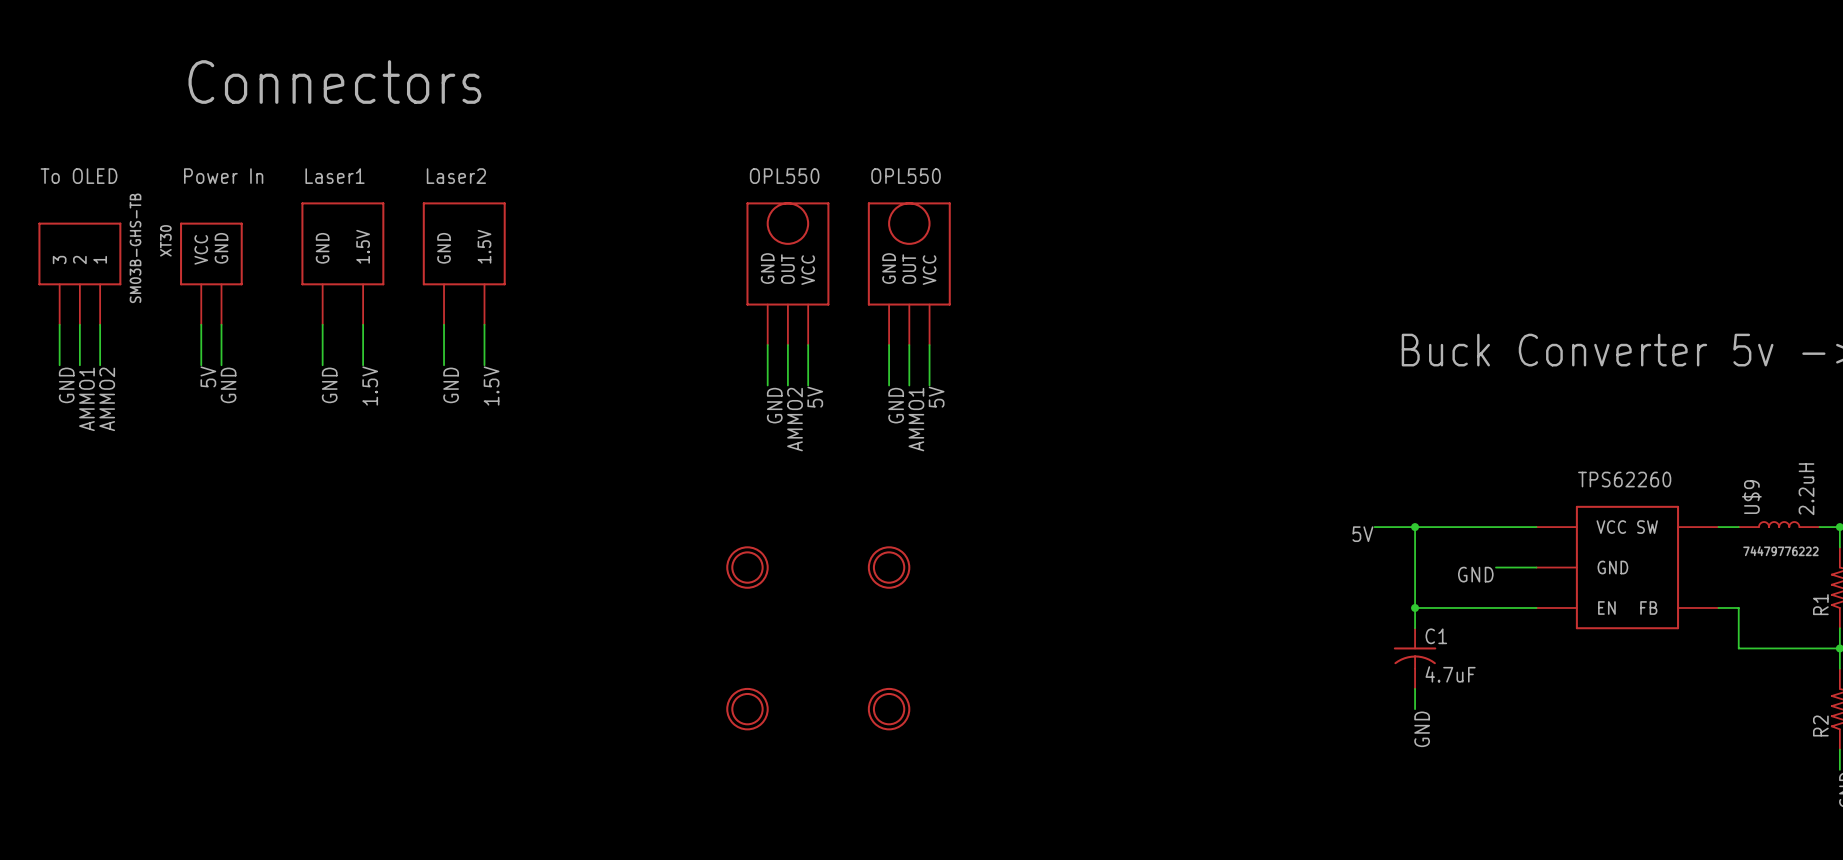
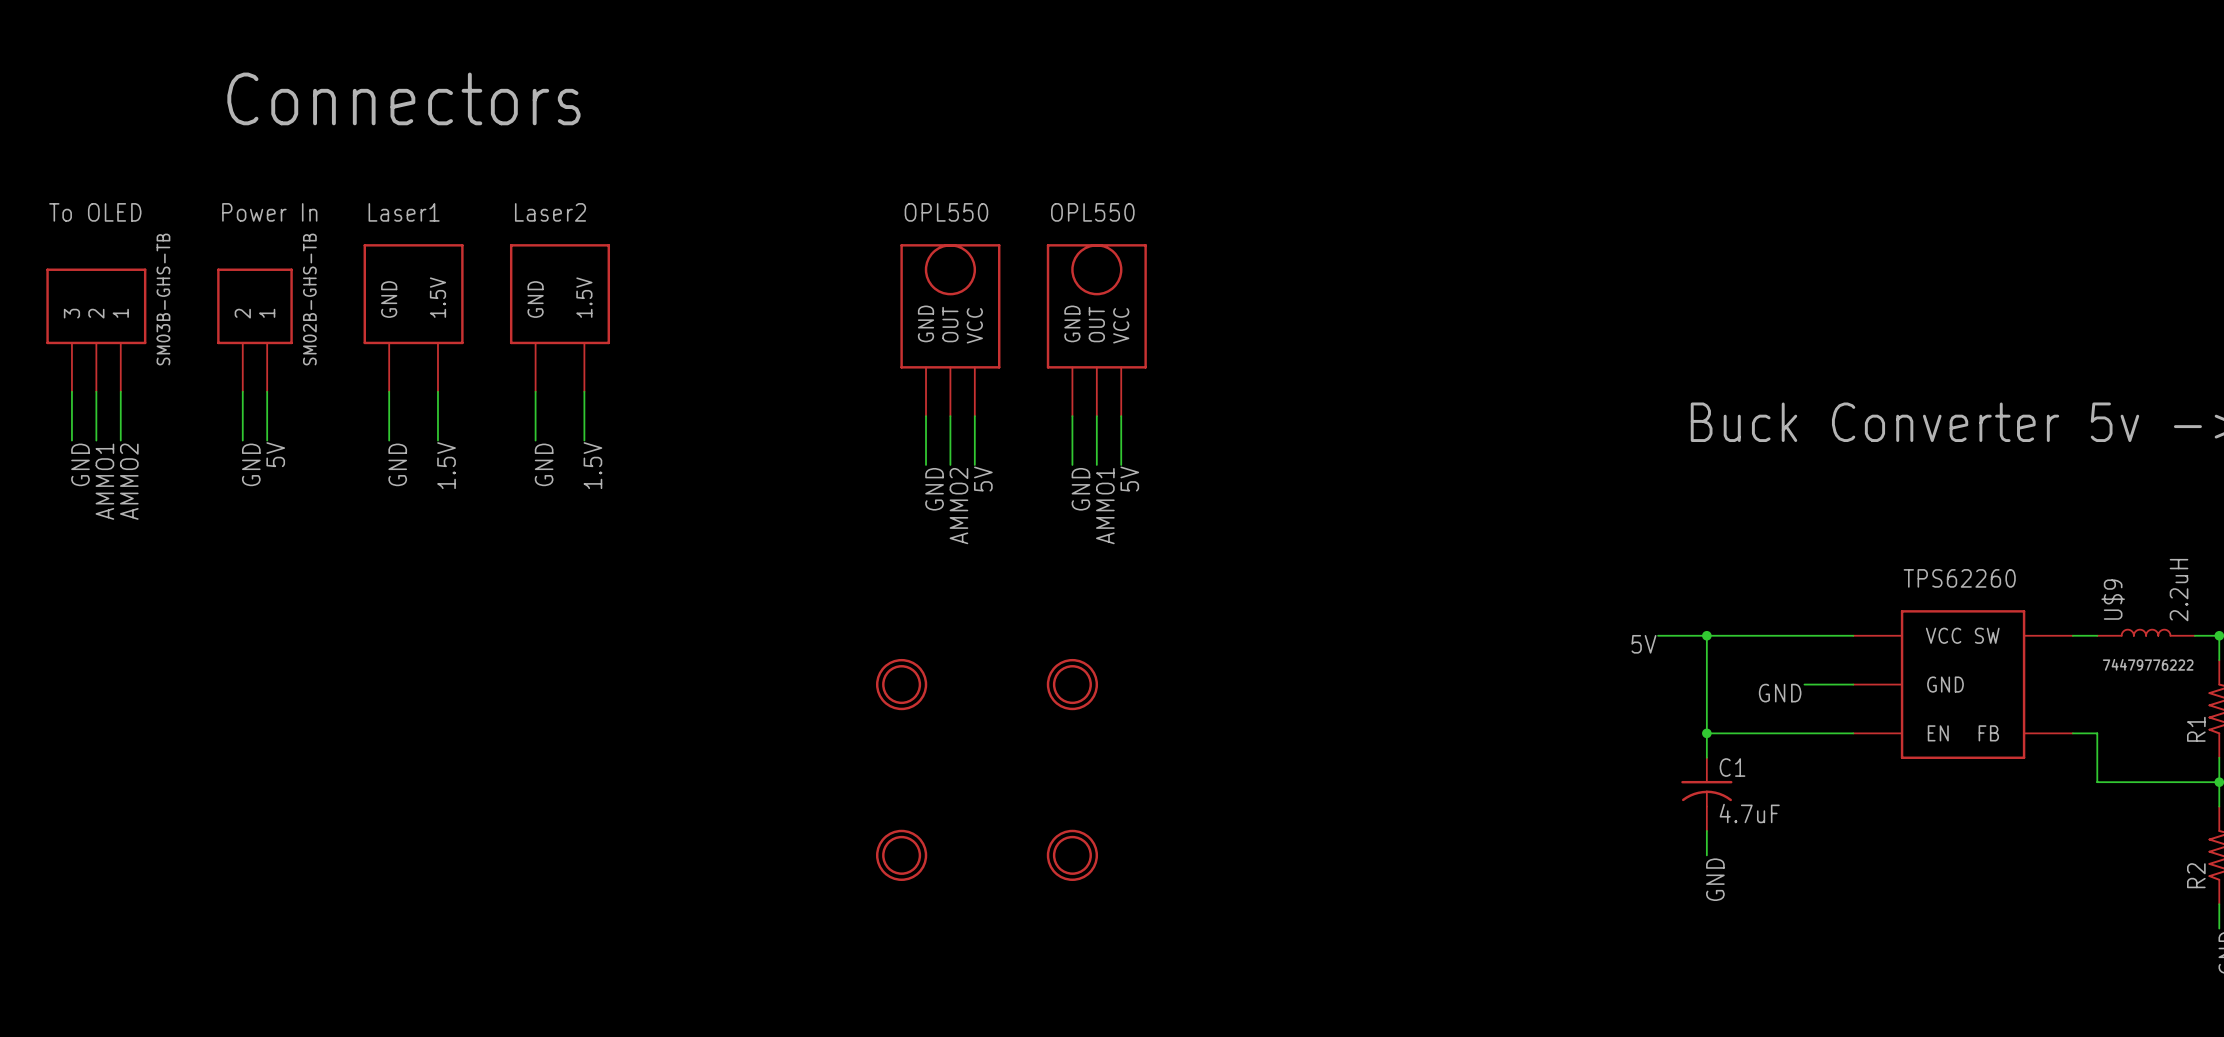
part text: XT30 (165, 240) -> none
part pin name: GND (221, 248) -> 1 (267, 313)
part text: none -> SM02B-GHS-TB (309, 299)
part pin name: VCC (201, 249) -> 2 (242, 313)
label: 5V (208, 376) -> GND (251, 464)
label: GND (228, 385) -> 5V (275, 454)

